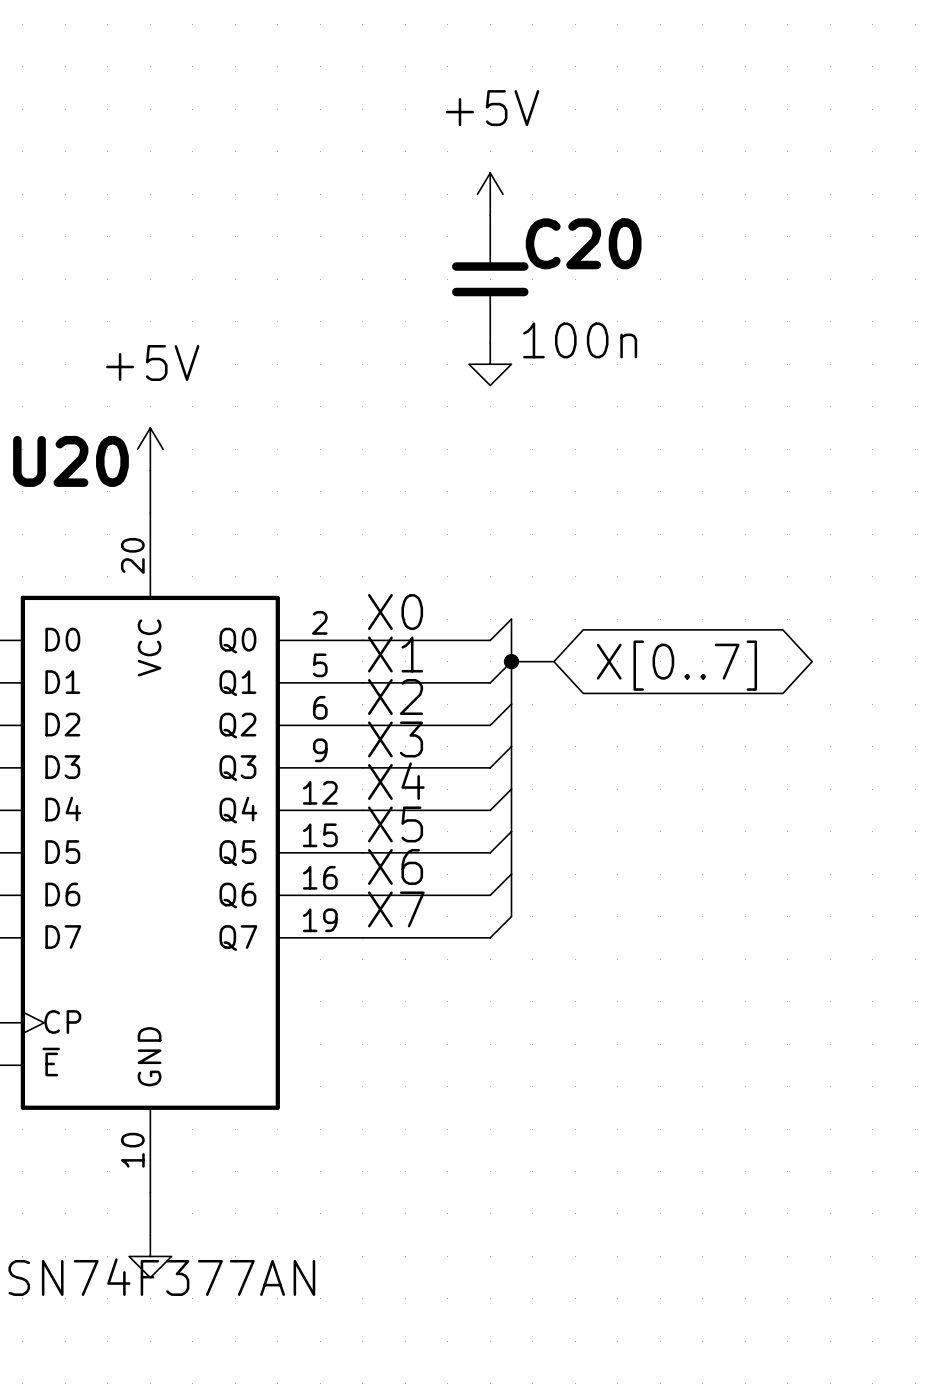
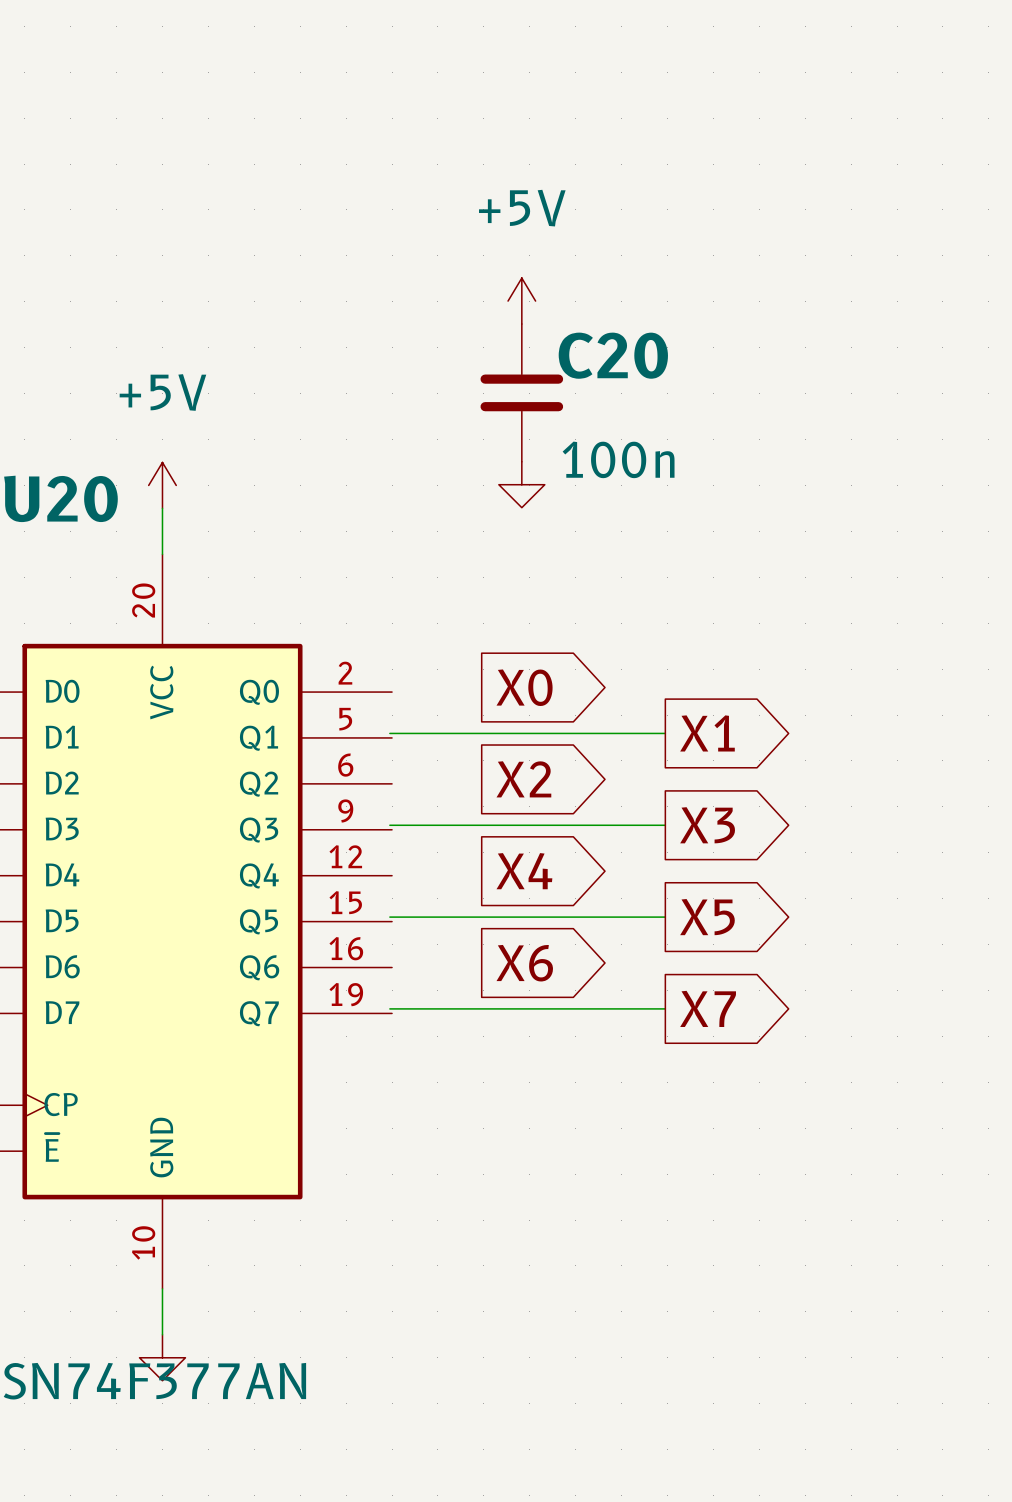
power symbol position: +5V (490, 194) -> +5V (521, 301)
C20 name position: C20 (583, 243) -> C20 (613, 355)
C20 position: (490, 279) -> (521, 392)
C20 value position: 100n (580, 340) -> 100n (618, 459)
power symbol position: (490, 364) -> (521, 484)
label: X0 (395, 612) -> none
wire: (511, 619) (490, 640) (362, 640) -> none
bus: (511, 619) (511, 916) -> none
global label: none -> X0 (524, 687)
label: X1 (395, 654) -> none
wire: (511, 661) (490, 682) (362, 682) -> none
bus: (511, 661) (553, 661) -> none
junction: (511, 661) -> none
global label: X[0..7] (676, 665) -> none
wire: none -> (389, 733) (665, 733)
global label: none -> X1 (707, 733)
label: X2 (395, 696) -> none
wire: (511, 704) (490, 725) (362, 725) -> none
global label: none -> X2 (523, 779)
label: X3 (395, 739) -> none
wire: (511, 746) (490, 767) (362, 767) -> none
wire: none -> (389, 825) (665, 825)
global label: none -> X3 (707, 825)
label: X4 (396, 781) -> none
wire: (511, 789) (490, 810) (362, 810) -> none
global label: none -> X4 (524, 871)
label: X5 (395, 824) -> none
wire: (511, 831) (490, 852) (362, 852) -> none
wire: none -> (389, 917) (665, 917)
global label: none -> X5 (707, 917)
label: X6 (395, 866) -> none
wire: (511, 874) (490, 895) (362, 895) -> none
global label: none -> X6 (524, 963)
label: X7 (396, 909) -> none
wire: (511, 916) (490, 937) (362, 937) -> none
wire: none -> (389, 1008) (665, 1008)
global label: none -> X7 (708, 1008)

